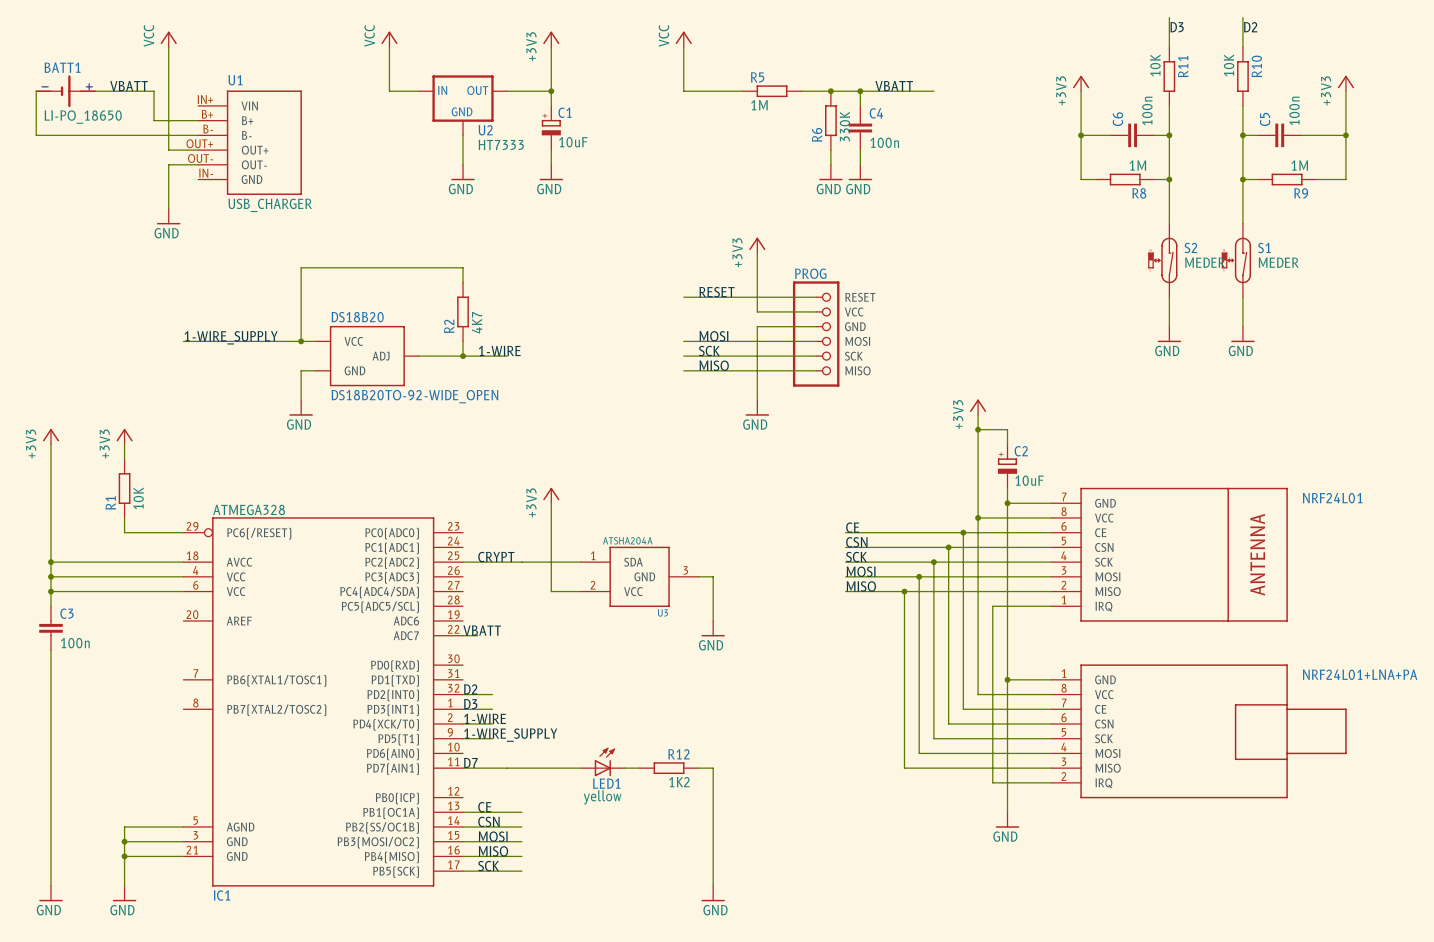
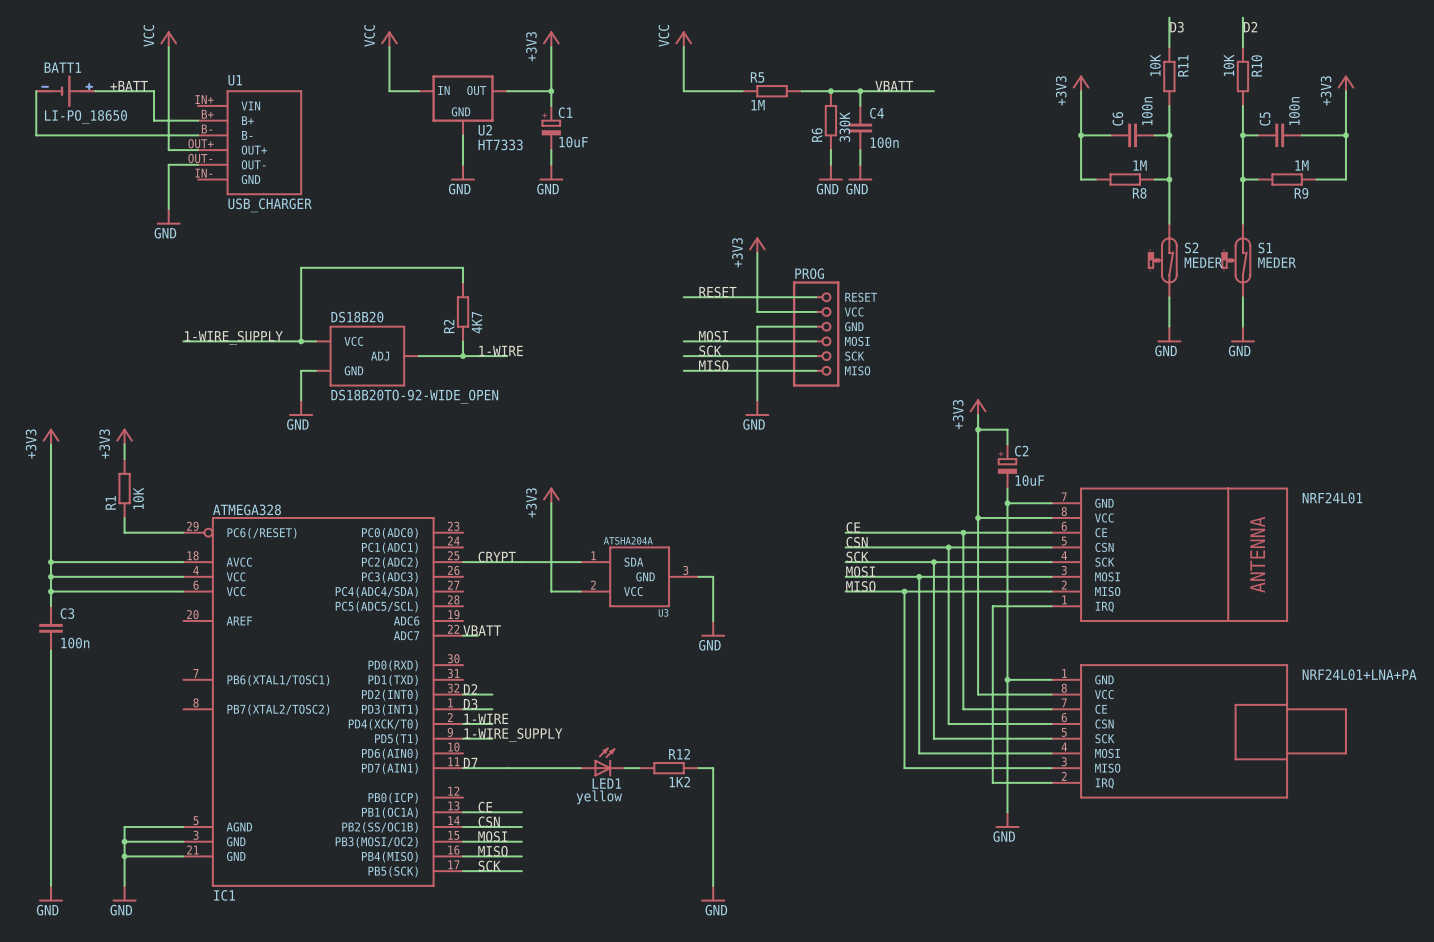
label: VBATT (129, 86) -> +BATT (129, 86)

